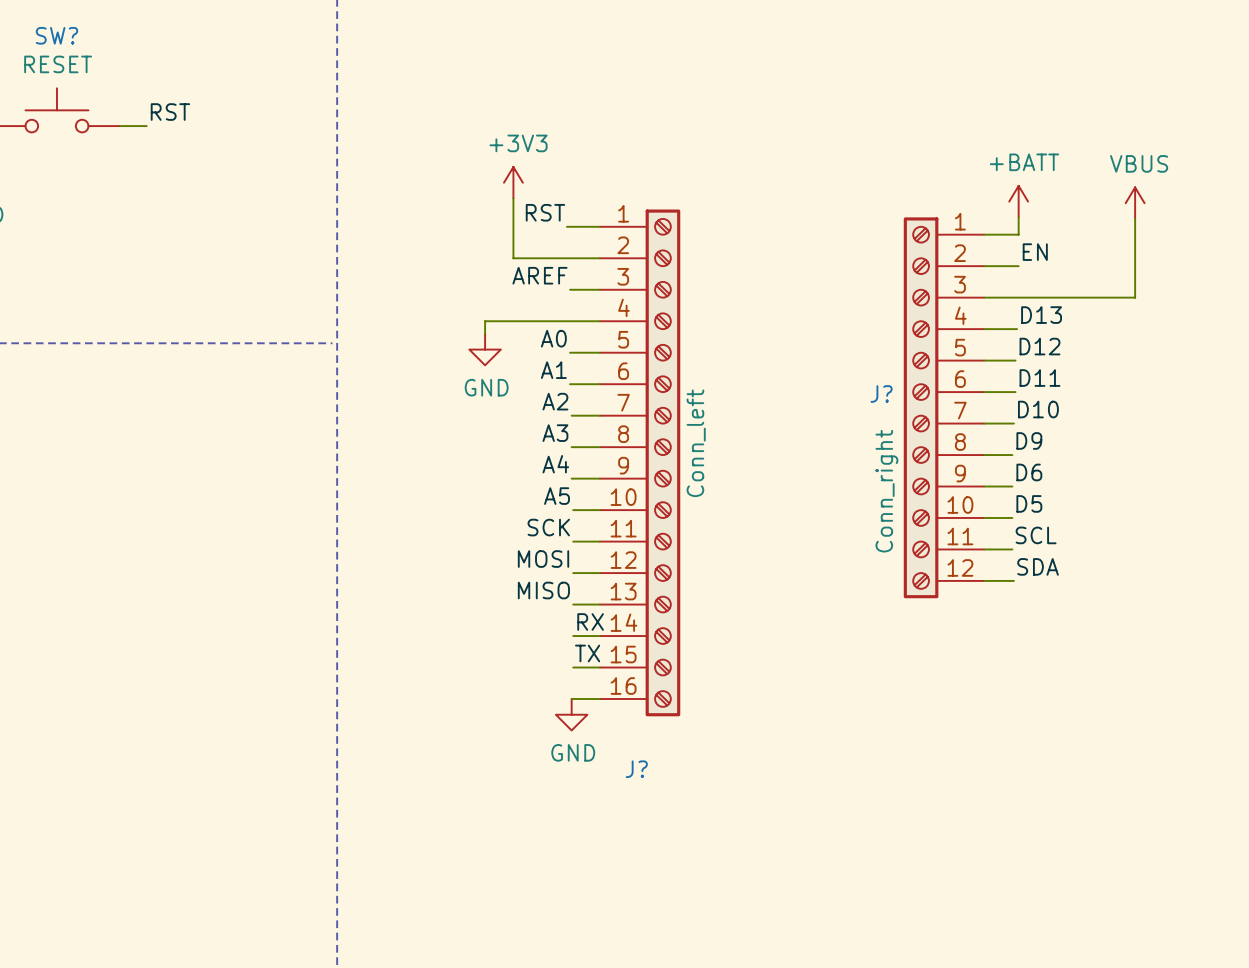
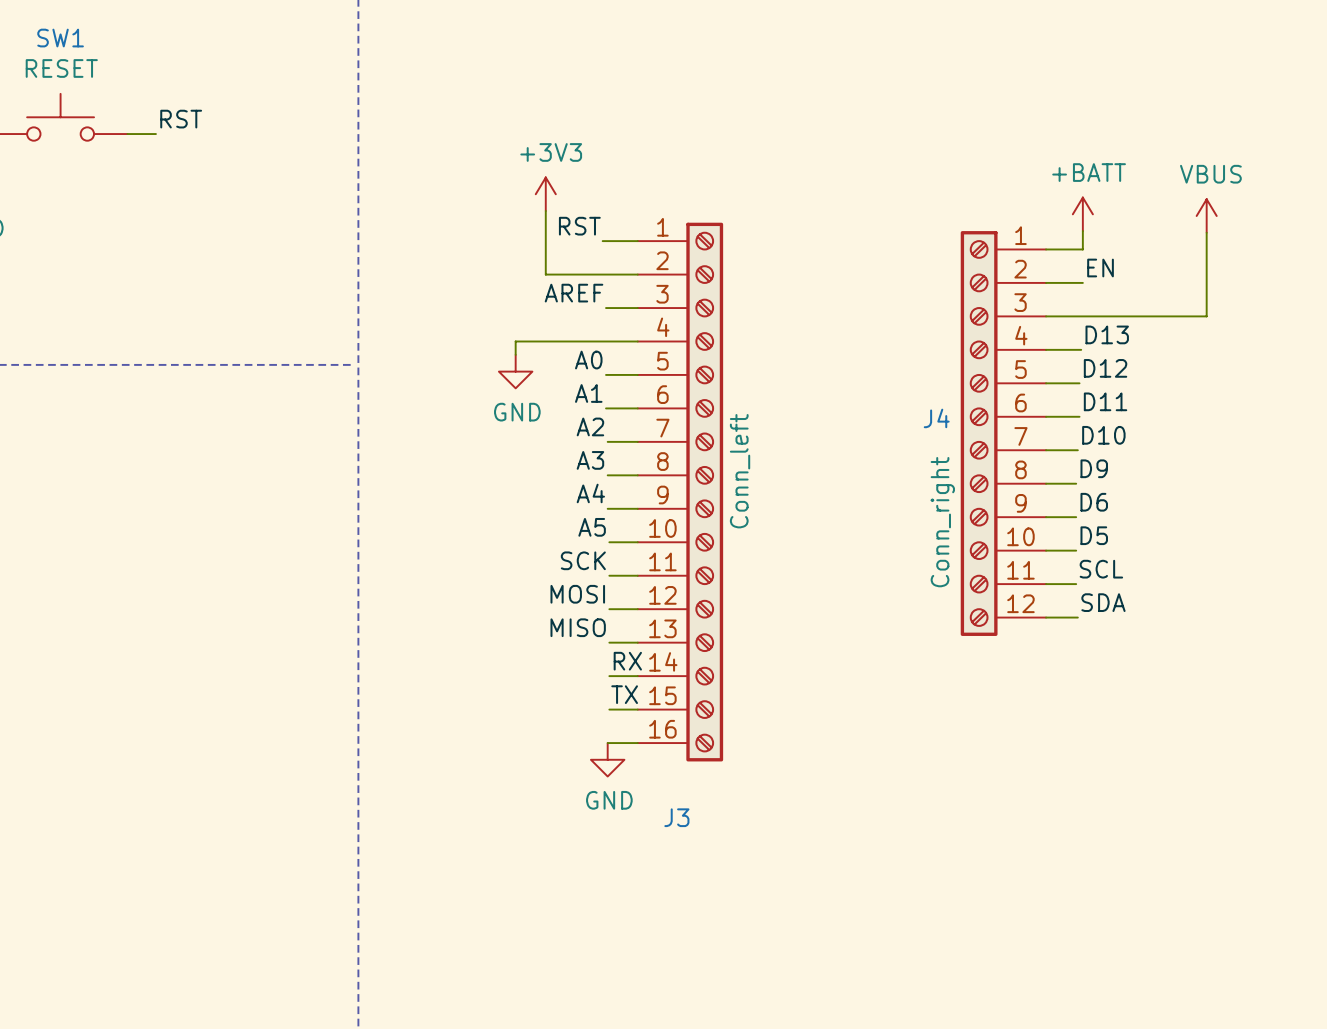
SW? name: SW? (56, 35) -> SW1 (60, 38)
J? name: J? (881, 394) -> J4 (936, 418)
J? name: J? (636, 769) -> J3 (676, 817)

